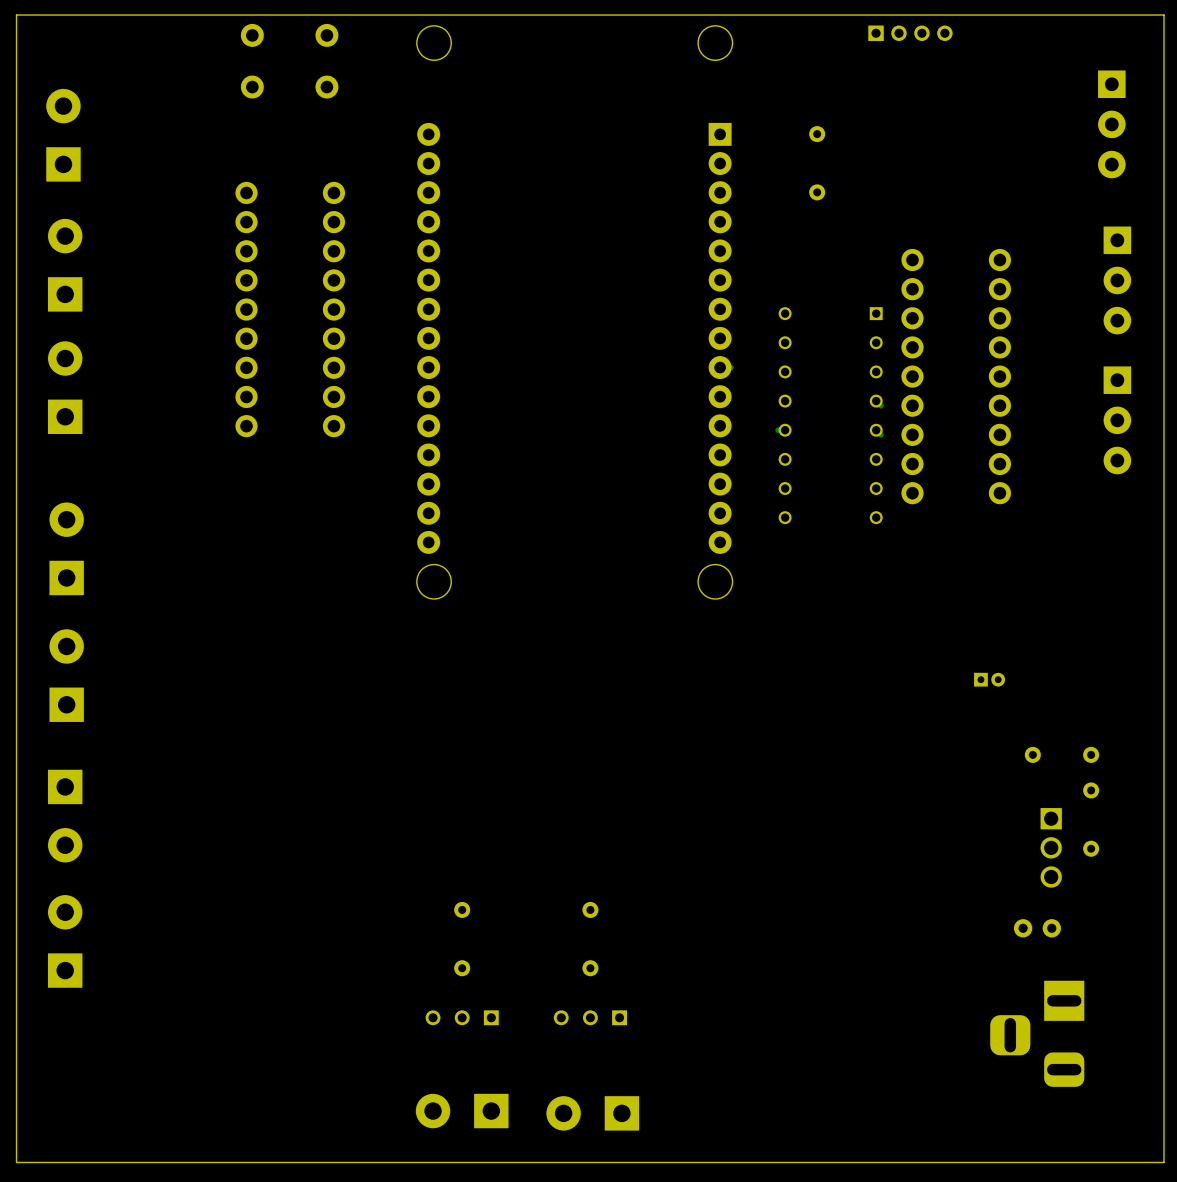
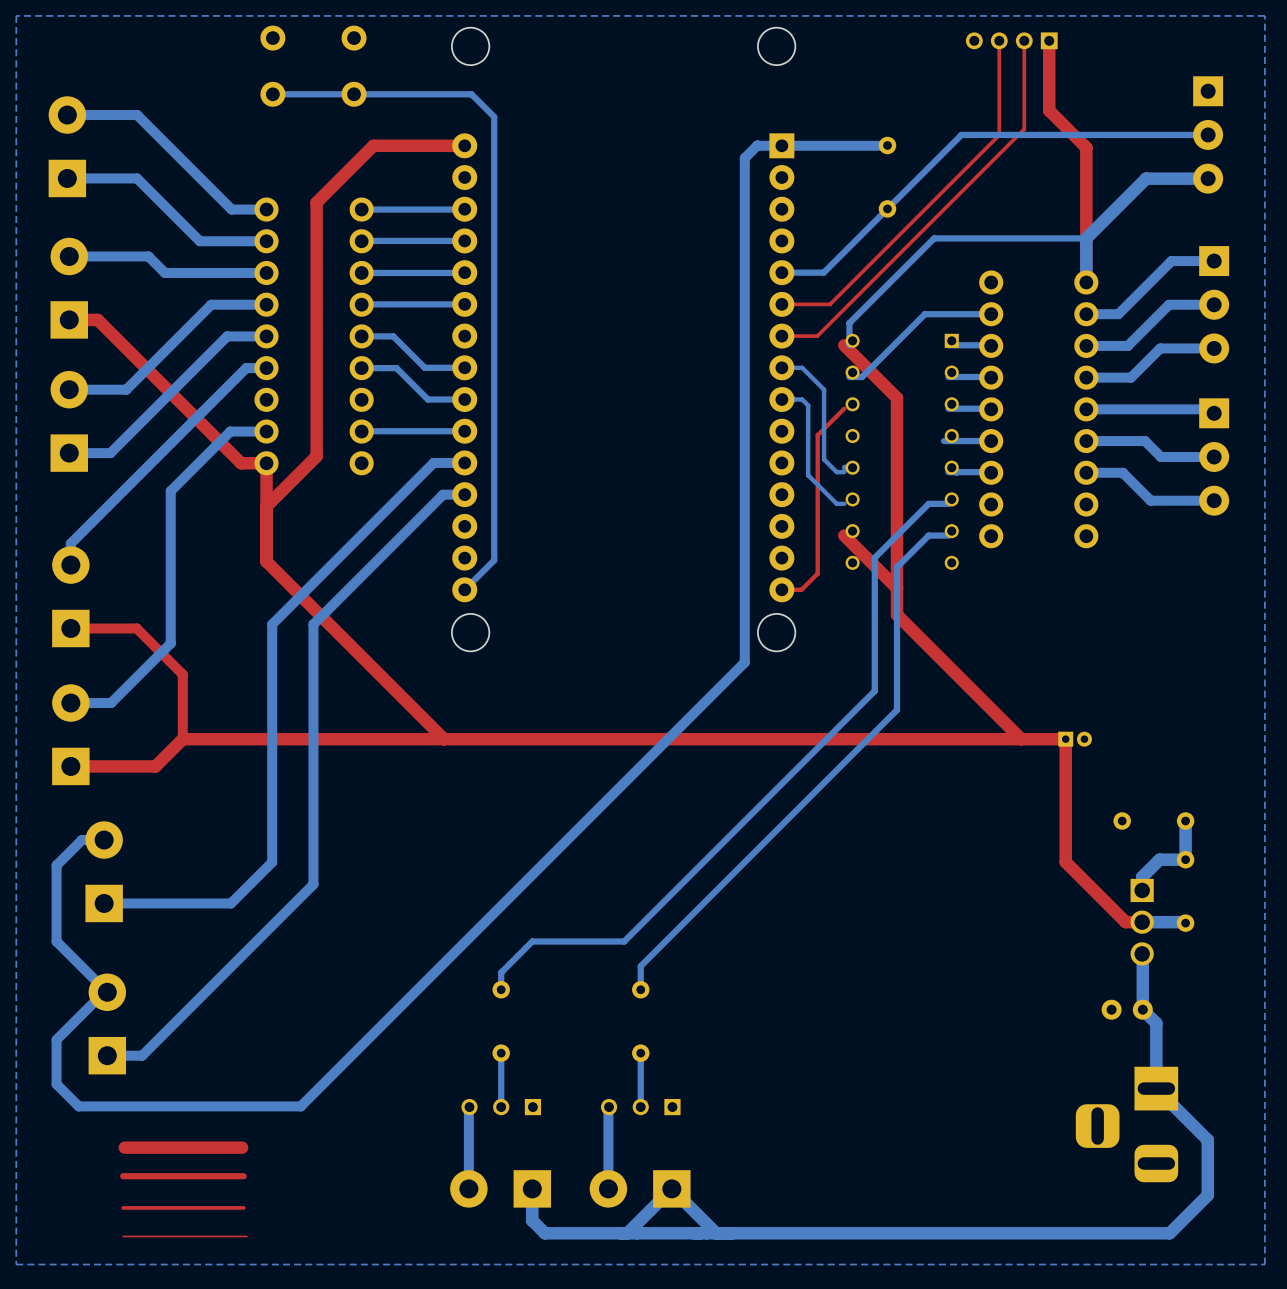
board edge: (1163, 15) (16, 15) (16, 1162) (1163, 1162) (1163, 15) -> none
bottom zone outline: none -> (1264, 15) (16, 15) (16, 1264) (1264, 1264) (1264, 15)
part rotation: 0° (910, 33) -> 180° (1011, 40)
top track: none -> (999, 40) (999, 135) (830, 304) (781, 304)
top track: none -> (1024, 40) (1024, 129) (817, 336) (781, 336)
top track: none -> (1049, 40) (1049, 110) (1086, 147) (1086, 282)
bottom track: none -> (272, 94) (471, 94) (494, 116) (494, 560) (464, 589)
bottom track: none -> (67, 115) (137, 115) (231, 209) (266, 209)
bottom track: none -> (1208, 134) (961, 134) (823, 272) (781, 272)
top track: none -> (464, 145) (373, 145) (316, 202) (316, 456) (266, 506)
bottom track: none -> (887, 145) (757, 145) (744, 158) (744, 662) (300, 1106) (78, 1106) (56, 1084) (56, 1039) (104, 992) (107, 992) (56, 941) (56, 865) (81, 840) (104, 840)
bottom track: none -> (67, 178) (137, 178) (199, 241) (266, 241)
bottom track: none -> (1208, 178) (1146, 178) (1086, 238)
bottom track: none -> (464, 209) (361, 209)
bottom track: none -> (1086, 238) (1086, 282)
bottom track: none -> (1086, 238) (934, 238) (849, 323) (849, 345)
bottom track: none -> (464, 240) (361, 241)
bottom track: none -> (69, 256) (148, 256) (165, 272) (266, 272)
bottom track: none -> (1214, 261) (1171, 261) (1118, 314) (1086, 314)
bottom track: none -> (464, 272) (361, 272)
bottom track: none -> (266, 304) (211, 304) (126, 389) (69, 389)
bottom track: none -> (464, 304) (361, 304)
bottom track: none -> (1214, 304) (1169, 304) (1127, 345) (1086, 345)
bottom track: none -> (991, 314) (924, 314) (862, 377) (849, 377)
top track: none -> (69, 319) (97, 319) (241, 463) (266, 463) (266, 561) (444, 739)
bottom track: none -> (266, 336) (227, 336) (110, 453) (69, 453)
bottom track: none -> (361, 336) (393, 336) (424, 367) (464, 367)
top track: none -> (844, 345) (897, 398) (897, 614) (1021, 739)
bottom track: none -> (990, 345) (948, 345)
bottom track: none -> (1214, 348) (1160, 348) (1131, 377) (1086, 377)
bottom track: none -> (266, 368) (246, 368) (70, 543) (70, 565)
bottom track: none -> (361, 368) (396, 368) (427, 399) (464, 399)
bottom track: none -> (781, 367) (802, 367) (824, 389) (824, 459) (836, 472) (844, 472)
bottom track: none -> (990, 377) (948, 377)
bottom track: none -> (793, 399) (802, 399) (808, 405) (808, 475) (836, 503) (844, 503)
top track: none -> (844, 408) (817, 435) (817, 573) (801, 589) (781, 589)
bottom track: none -> (990, 408) (948, 408)
bottom track: none -> (1210, 409) (1086, 409)
bottom track: none -> (266, 431) (230, 431) (170, 491) (170, 643) (111, 703) (70, 703)
bottom track: none -> (464, 431) (361, 431)
bottom track: none -> (991, 441) (944, 441)
bottom track: none -> (1086, 441) (1145, 441) (1160, 456) (1214, 456)
bottom track: none -> (464, 462) (433, 462) (272, 624) (272, 862) (231, 903) (104, 903)
bottom track: none -> (948, 472) (991, 472)
bottom track: none -> (1086, 472) (1122, 472) (1150, 500) (1214, 500)
bottom track: none -> (464, 494) (443, 494) (313, 624) (313, 884) (142, 1055) (107, 1055)
bottom track: none -> (948, 503) (928, 503) (874, 557) (874, 690) (624, 941) (532, 941) (501, 972) (501, 989)
top track: none -> (844, 535) (897, 588)
bottom track: none -> (948, 535) (928, 535) (897, 567) (897, 710) (640, 966) (640, 989)
top track: none -> (70, 628) (136, 628) (182, 674) (182, 739)
top track: none -> (182, 739) (1065, 739) (1065, 862) (1125, 922) (1142, 922)
top track: none -> (182, 739) (155, 766) (70, 766)
bottom track: none -> (1185, 824) (1185, 859) (1159, 859) (1142, 877) (1142, 890)
part rotation: 0° (65, 816) -> 180° (104, 871)
bottom track: none -> (1142, 922) (1185, 923)
bottom track: none -> (1142, 954) (1142, 1009) (1156, 1023) (1156, 1088) (1207, 1140) (1207, 1195) (1169, 1233) (544, 1233) (532, 1220) (532, 1188)
part position: (65, 941) -> (107, 1023)
bottom track: none -> (501, 1053) (501, 1107)
bottom track: none -> (640, 1053) (640, 1107)
bottom track: none -> (469, 1107) (469, 1188)
bottom track: none -> (609, 1107) (608, 1188)
top track: none -> (242, 1147) (124, 1147)
top track: none -> (243, 1176) (123, 1176)
top track: none -> (243, 1207) (123, 1207)
part position: (462, 1111) -> (500, 1188)
part position: (592, 1113) -> (640, 1188)
bottom track: none -> (716, 1233) (671, 1188) (627, 1233)
top track: none -> (246, 1236) (123, 1236)

